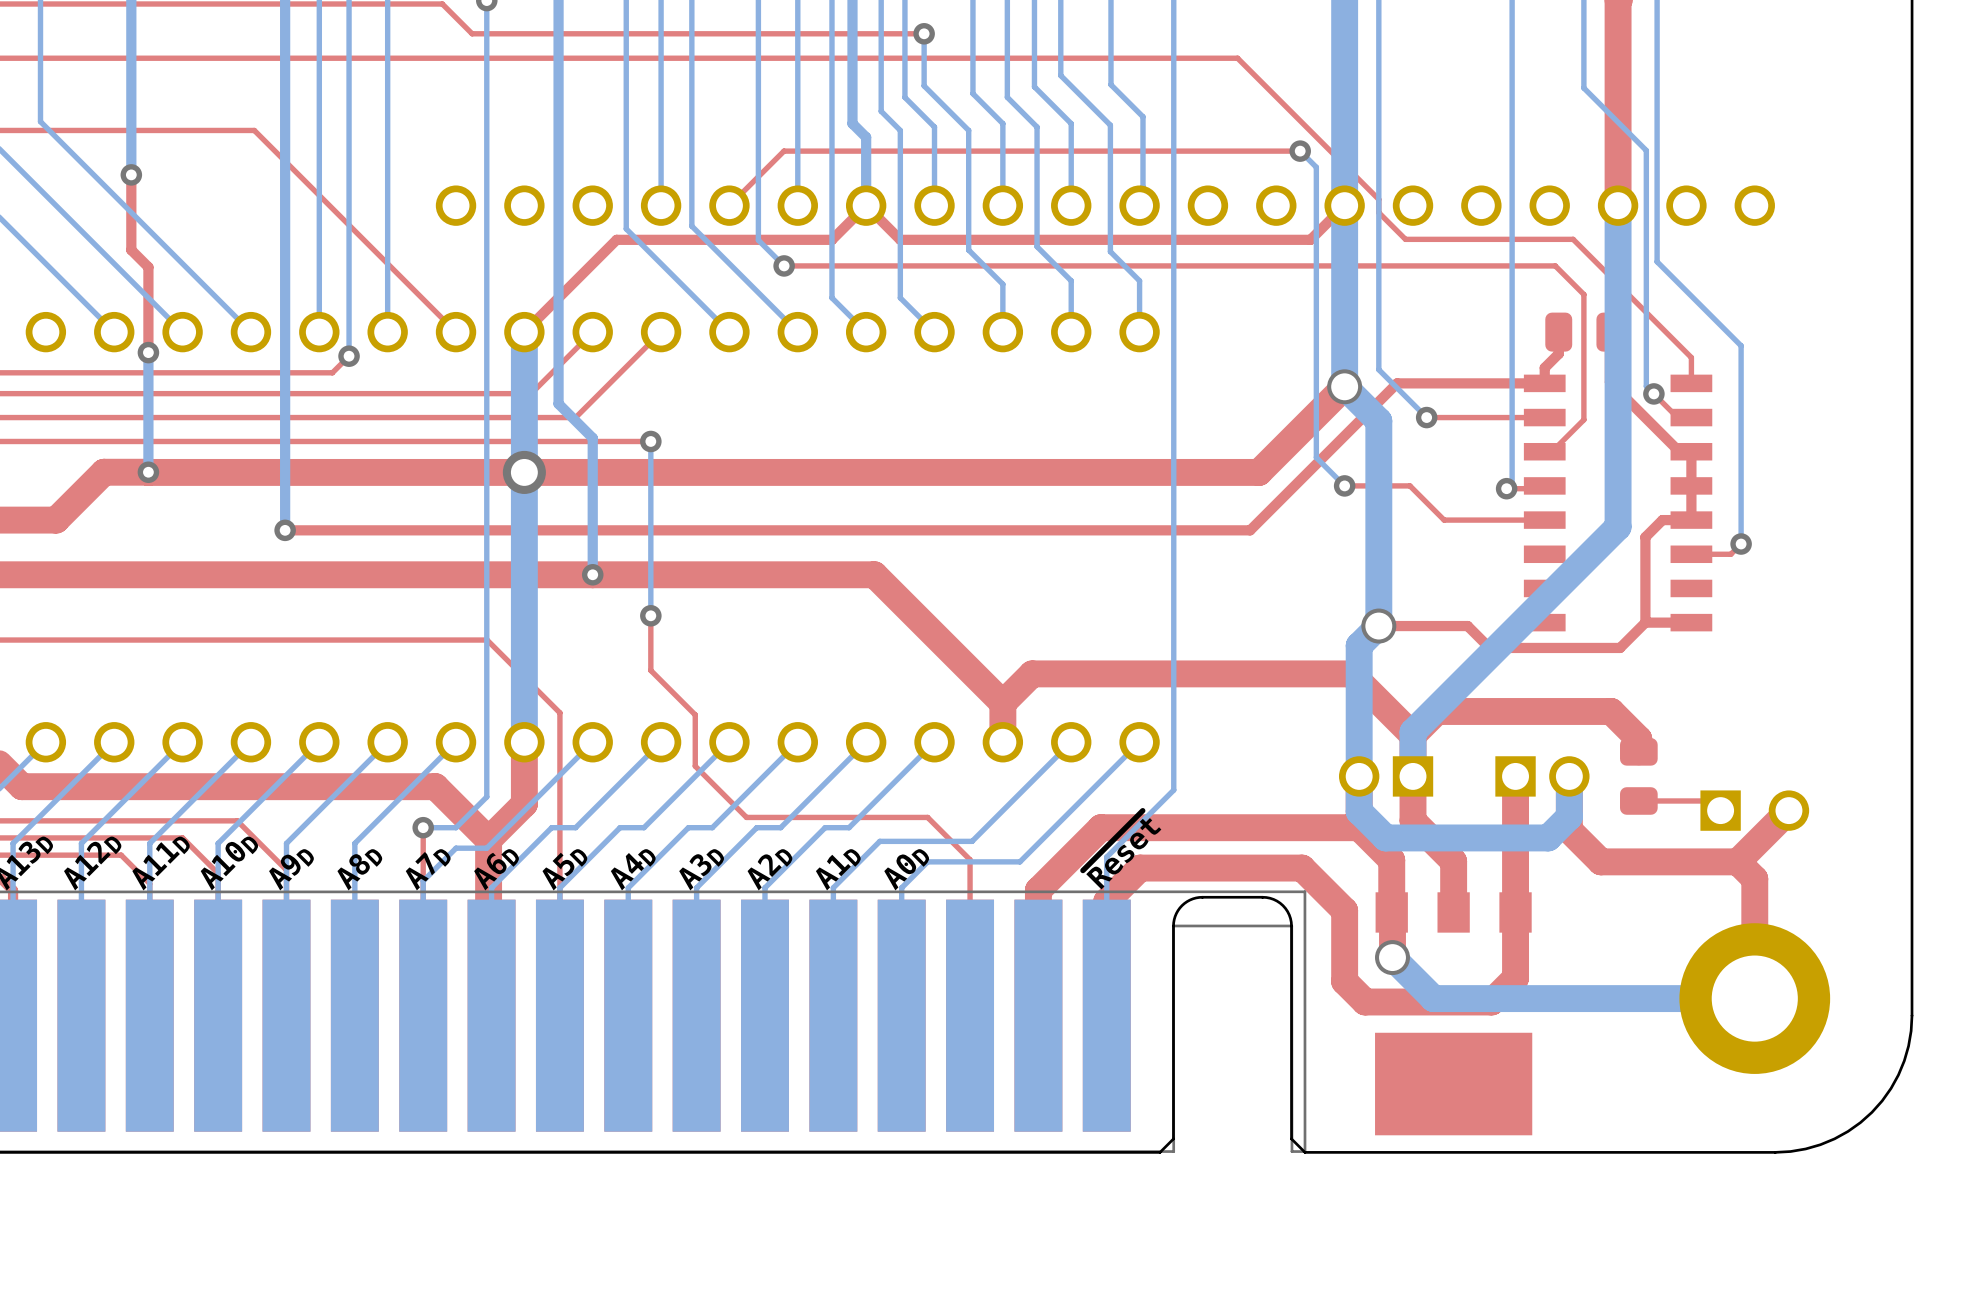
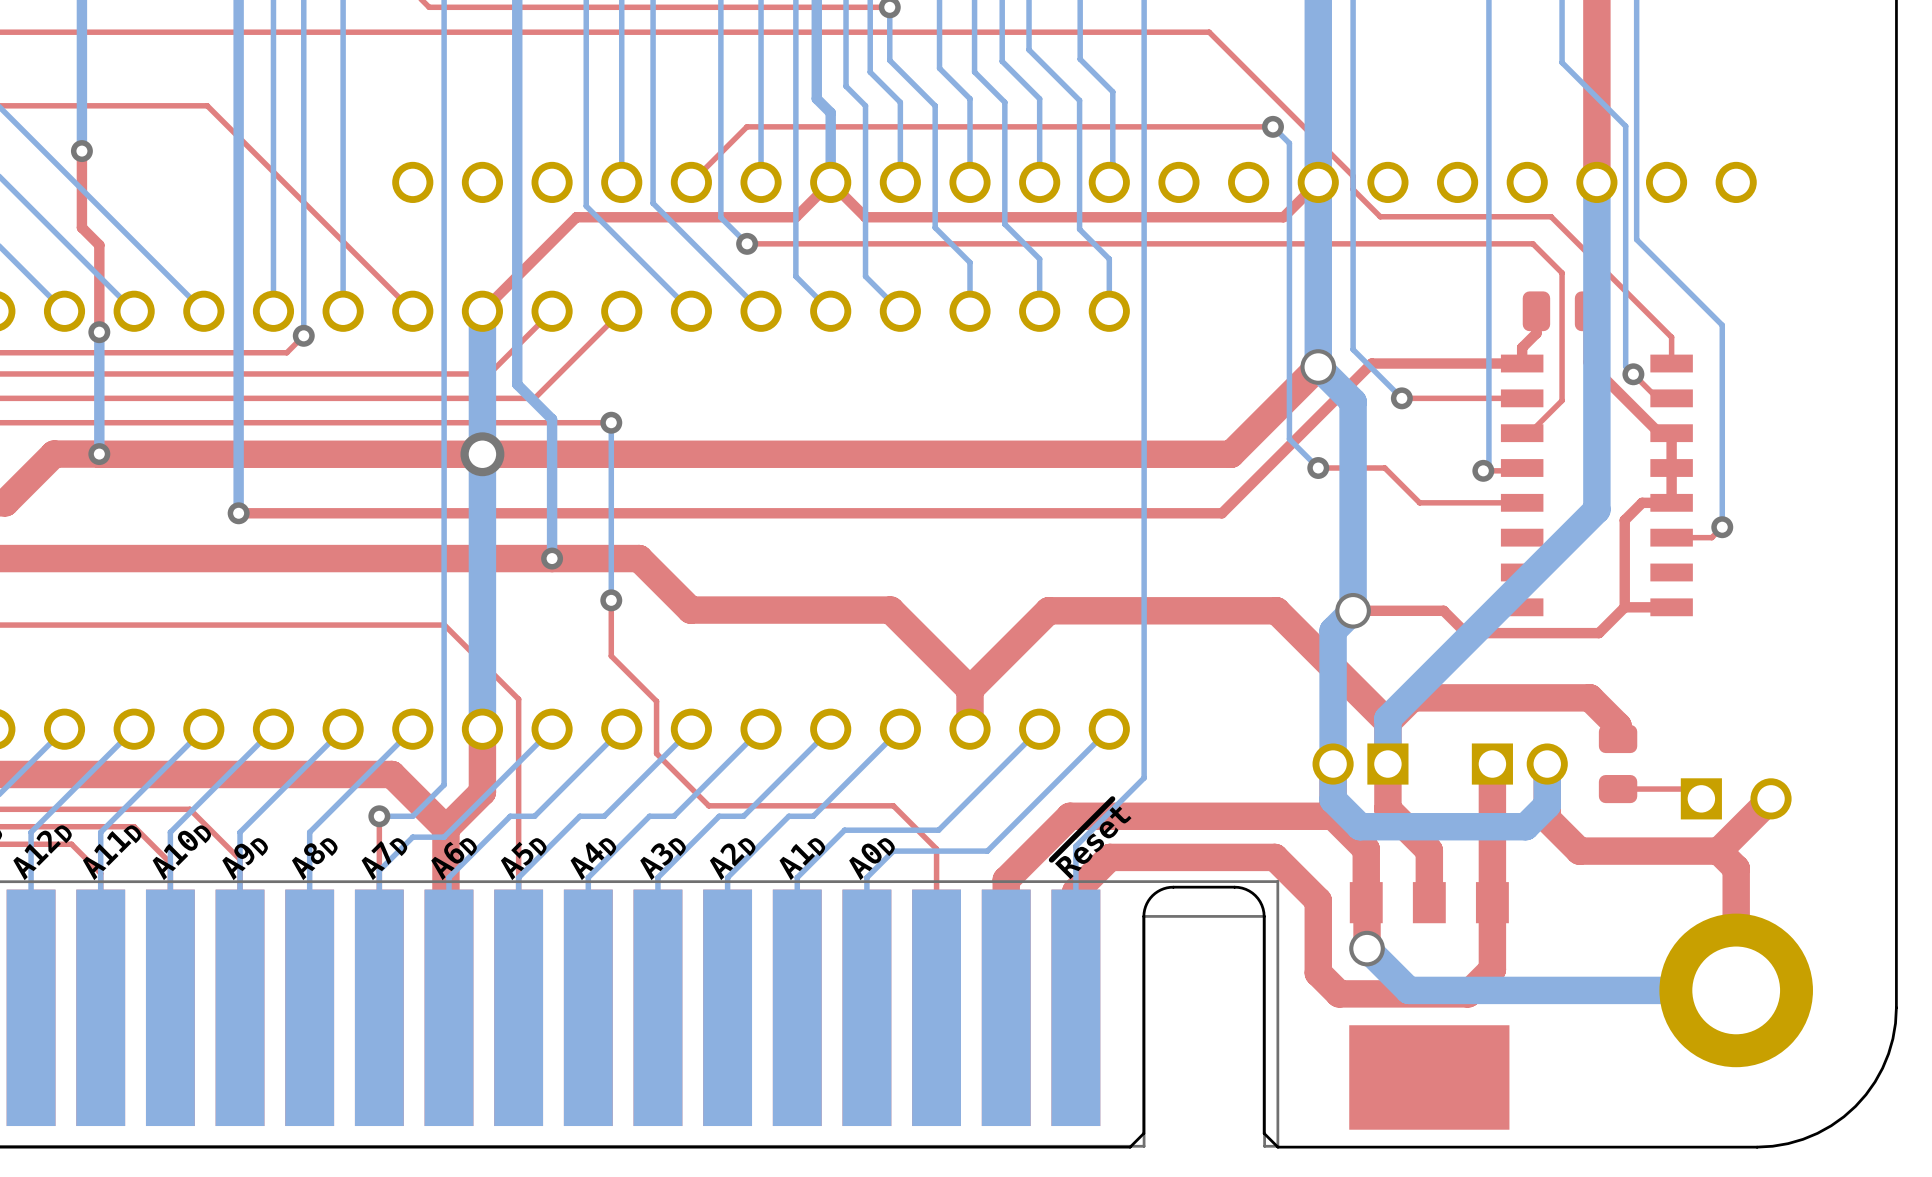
top track: (678, 574) (874, 574) (924, 625) -> (639, 558) (690, 610) (890, 610)
top track: (1351, 673) (1032, 673) -> (1325, 659) (1276, 610) (1048, 610) (999, 659)

